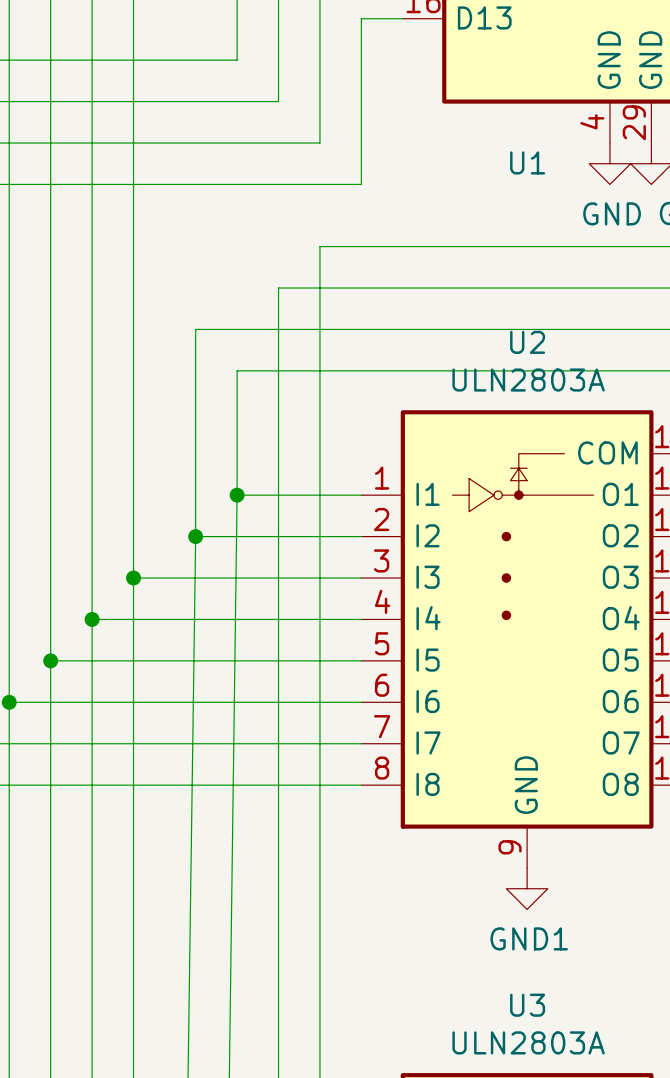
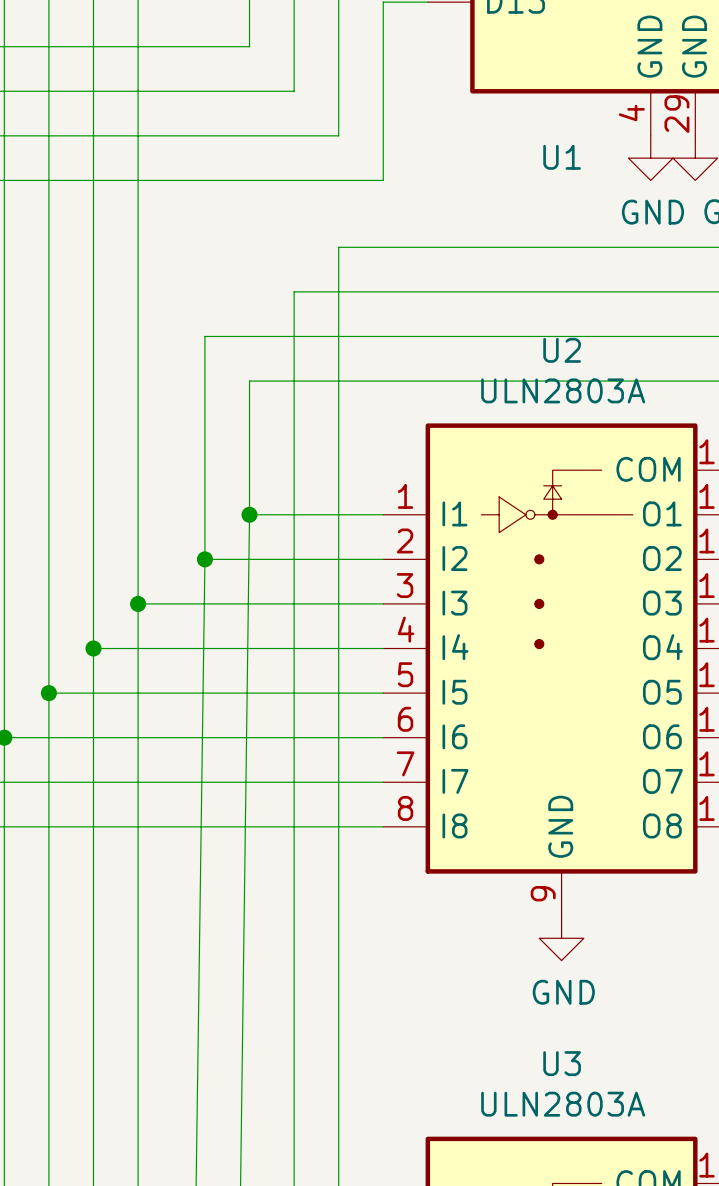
power symbol: GND1 (527, 888) -> GND (561, 938)

